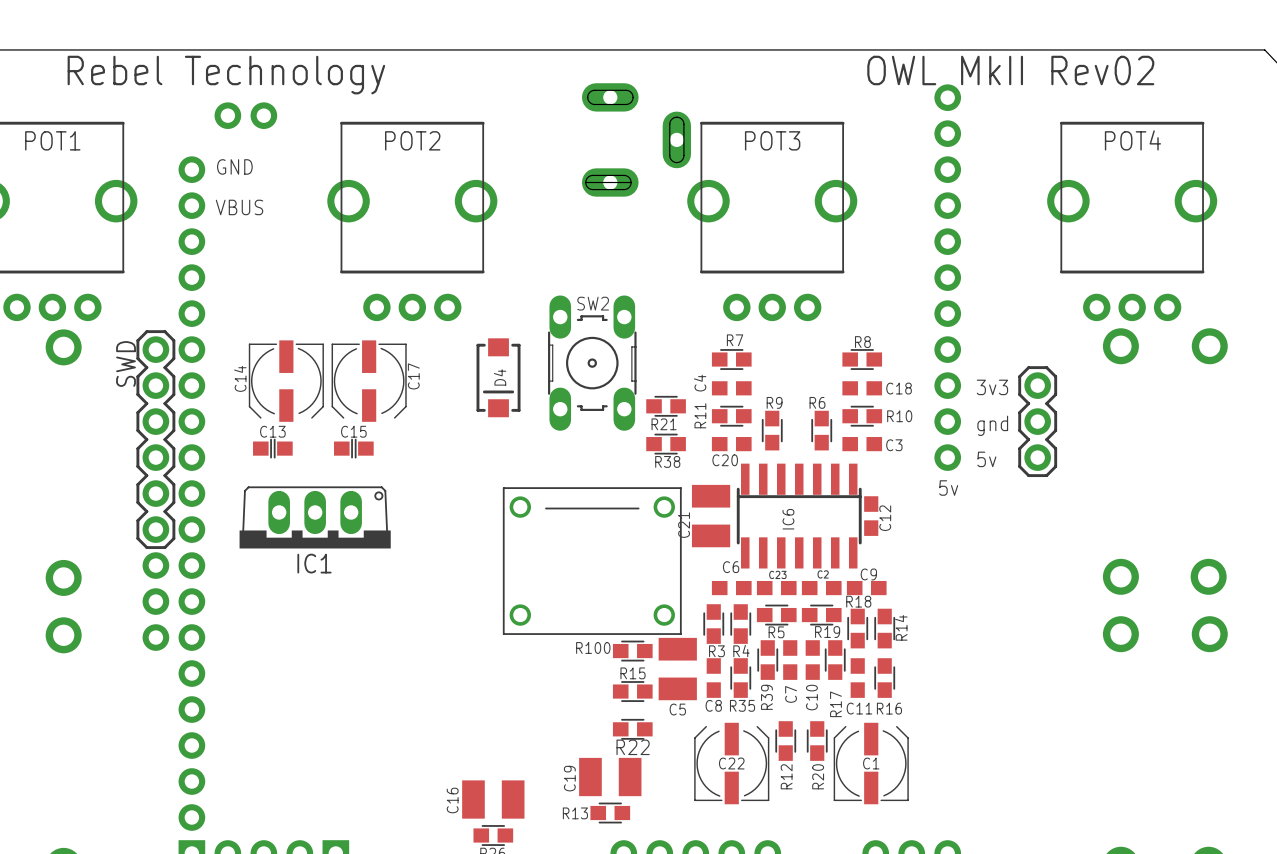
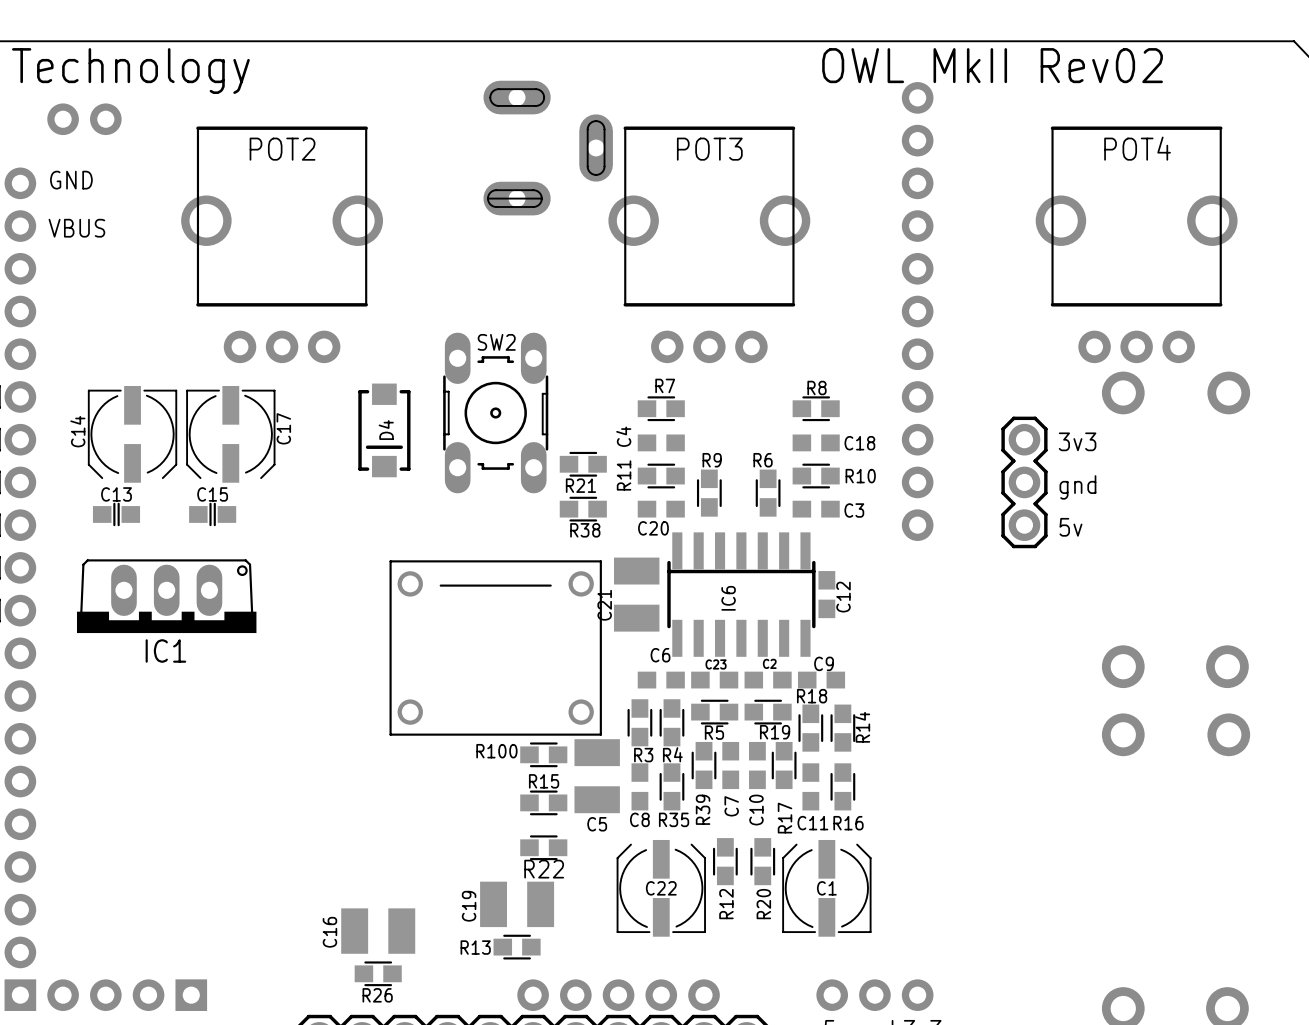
text position: 3v3 (992, 387) -> 3v3 (1077, 441)
text position: gnd (992, 425) -> gnd (1077, 487)
text: 5v (986, 459) -> none
text: none -> 5v (1070, 527)
text: 5v (948, 488) -> none

